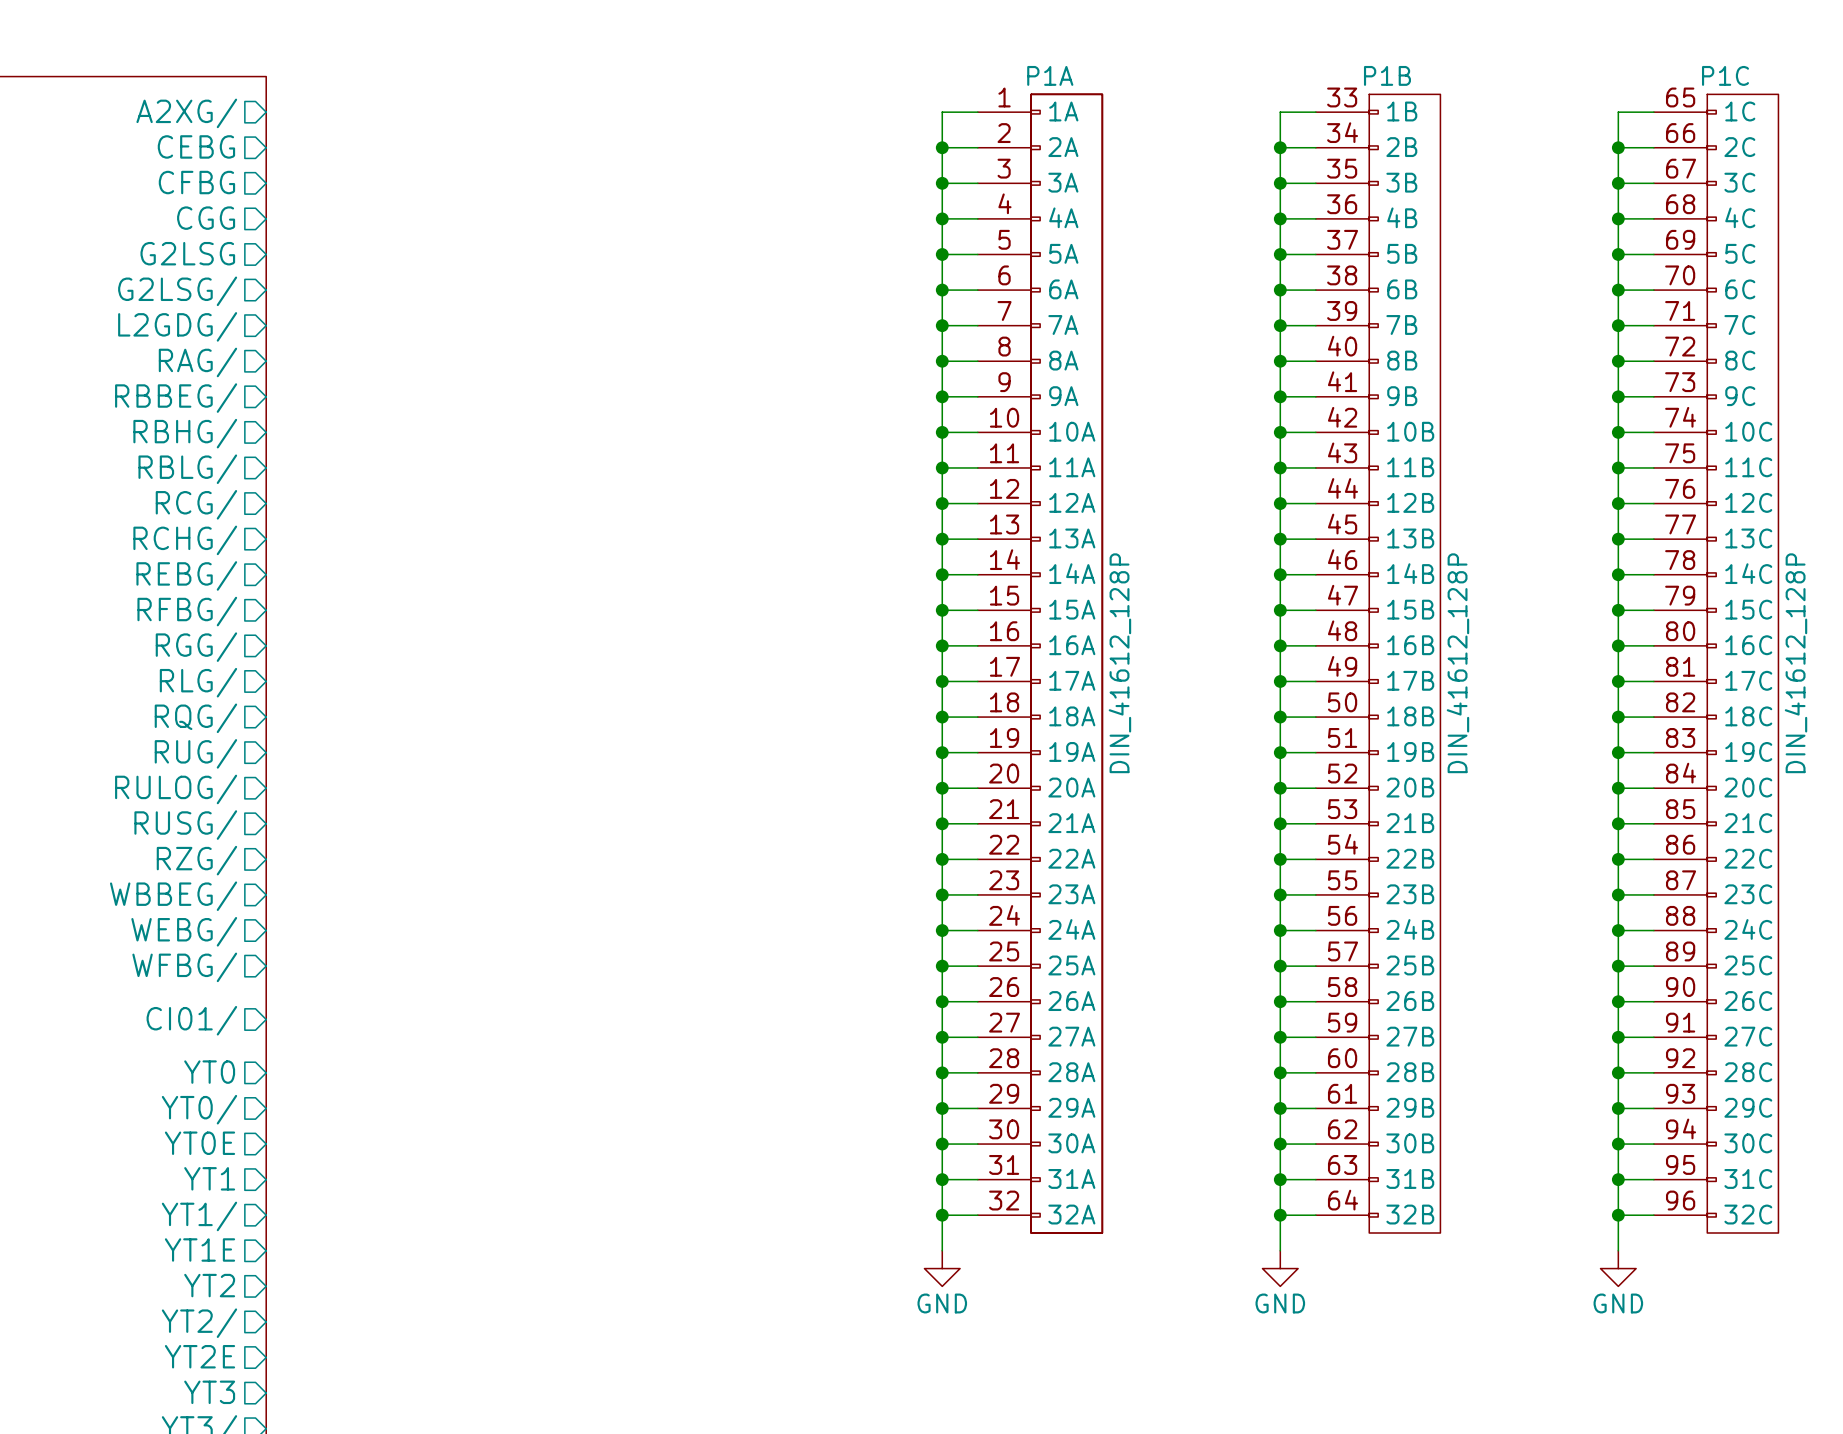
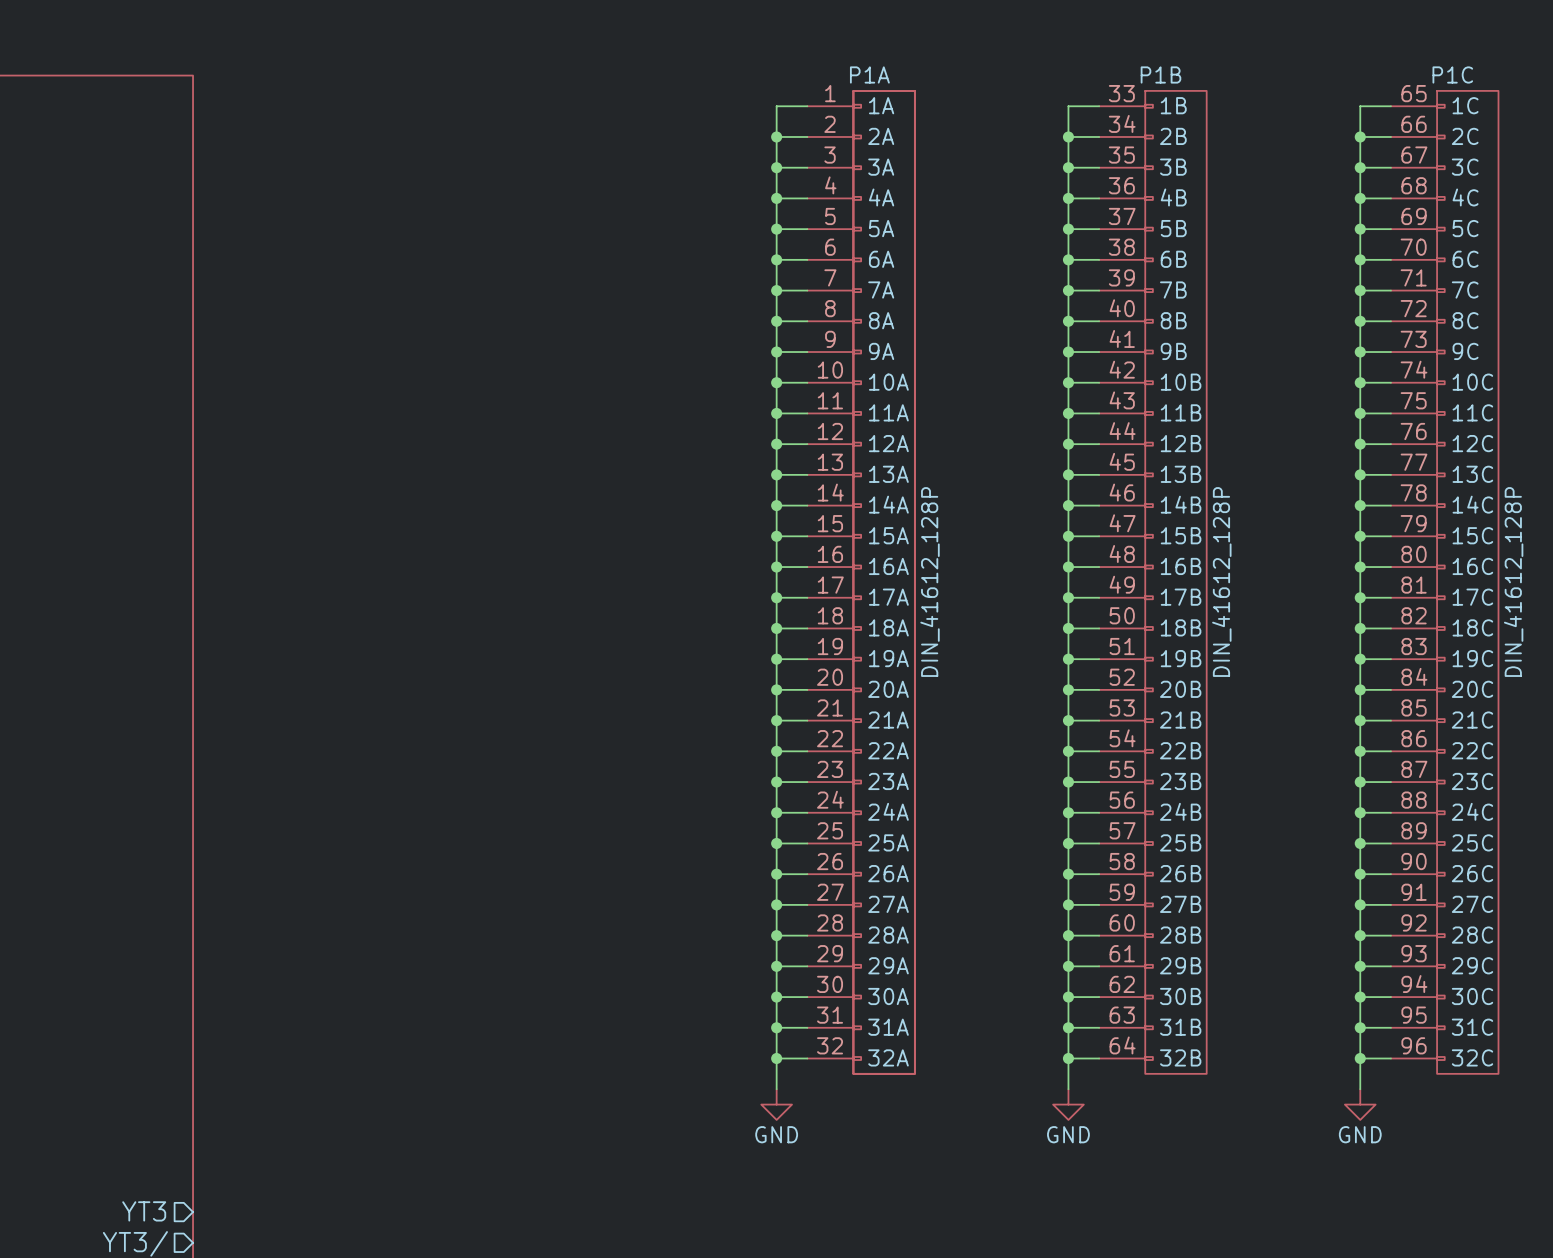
sheet pin: A2XG/ (186, 113) -> none
sheet pin: CEBG (196, 146) -> none
sheet pin: CFBG (196, 182) -> none
sheet pin: CGG (206, 218) -> none
sheet pin: G2LSG (187, 253) -> none
sheet pin: G2LSG/ (177, 291) -> none
sheet pin: L2GDG/ (177, 326) -> none
sheet pin: RAG/ (197, 362) -> none
sheet pin: RBBEG/ (176, 398) -> none
sheet pin: RBHG/ (185, 433) -> none
sheet pin: RBLG/ (187, 469) -> none
sheet pin: RCG/ (196, 504) -> none
sheet pin: RCHG/ (185, 540) -> none
sheet pin: REBG/ (186, 575) -> none
sheet pin: RFBG/ (187, 611) -> none
sheet pin: RGG/ (196, 647) -> none
sheet pin: RLG/ (198, 682) -> none
sheet pin: RQG/ (195, 718) -> none
sheet pin: RUG/ (195, 753) -> none
sheet pin: RULOG/ (176, 789) -> none
sheet pin: RUSG/ (185, 825) -> none
sheet pin: RZG/ (196, 860) -> none
sheet pin: WBBEG/ (173, 896) -> none
sheet pin: WEBG/ (184, 931) -> none
sheet pin: WFBG/ (184, 967) -> none
sheet pin: CI01/ (191, 1020) -> none
sheet pin: YT0 (209, 1072) -> none
sheet pin: YT0/ (199, 1109) -> none
sheet pin: YT0E (199, 1143) -> none
sheet pin: YT1 (209, 1178) -> none
sheet pin: YT1/ (199, 1216) -> none
sheet pin: YT1E (199, 1249) -> none
sheet pin: YT2 (209, 1285) -> none
sheet pin: YT2/ (199, 1323) -> none
sheet pin: YT2E (199, 1356) -> none

